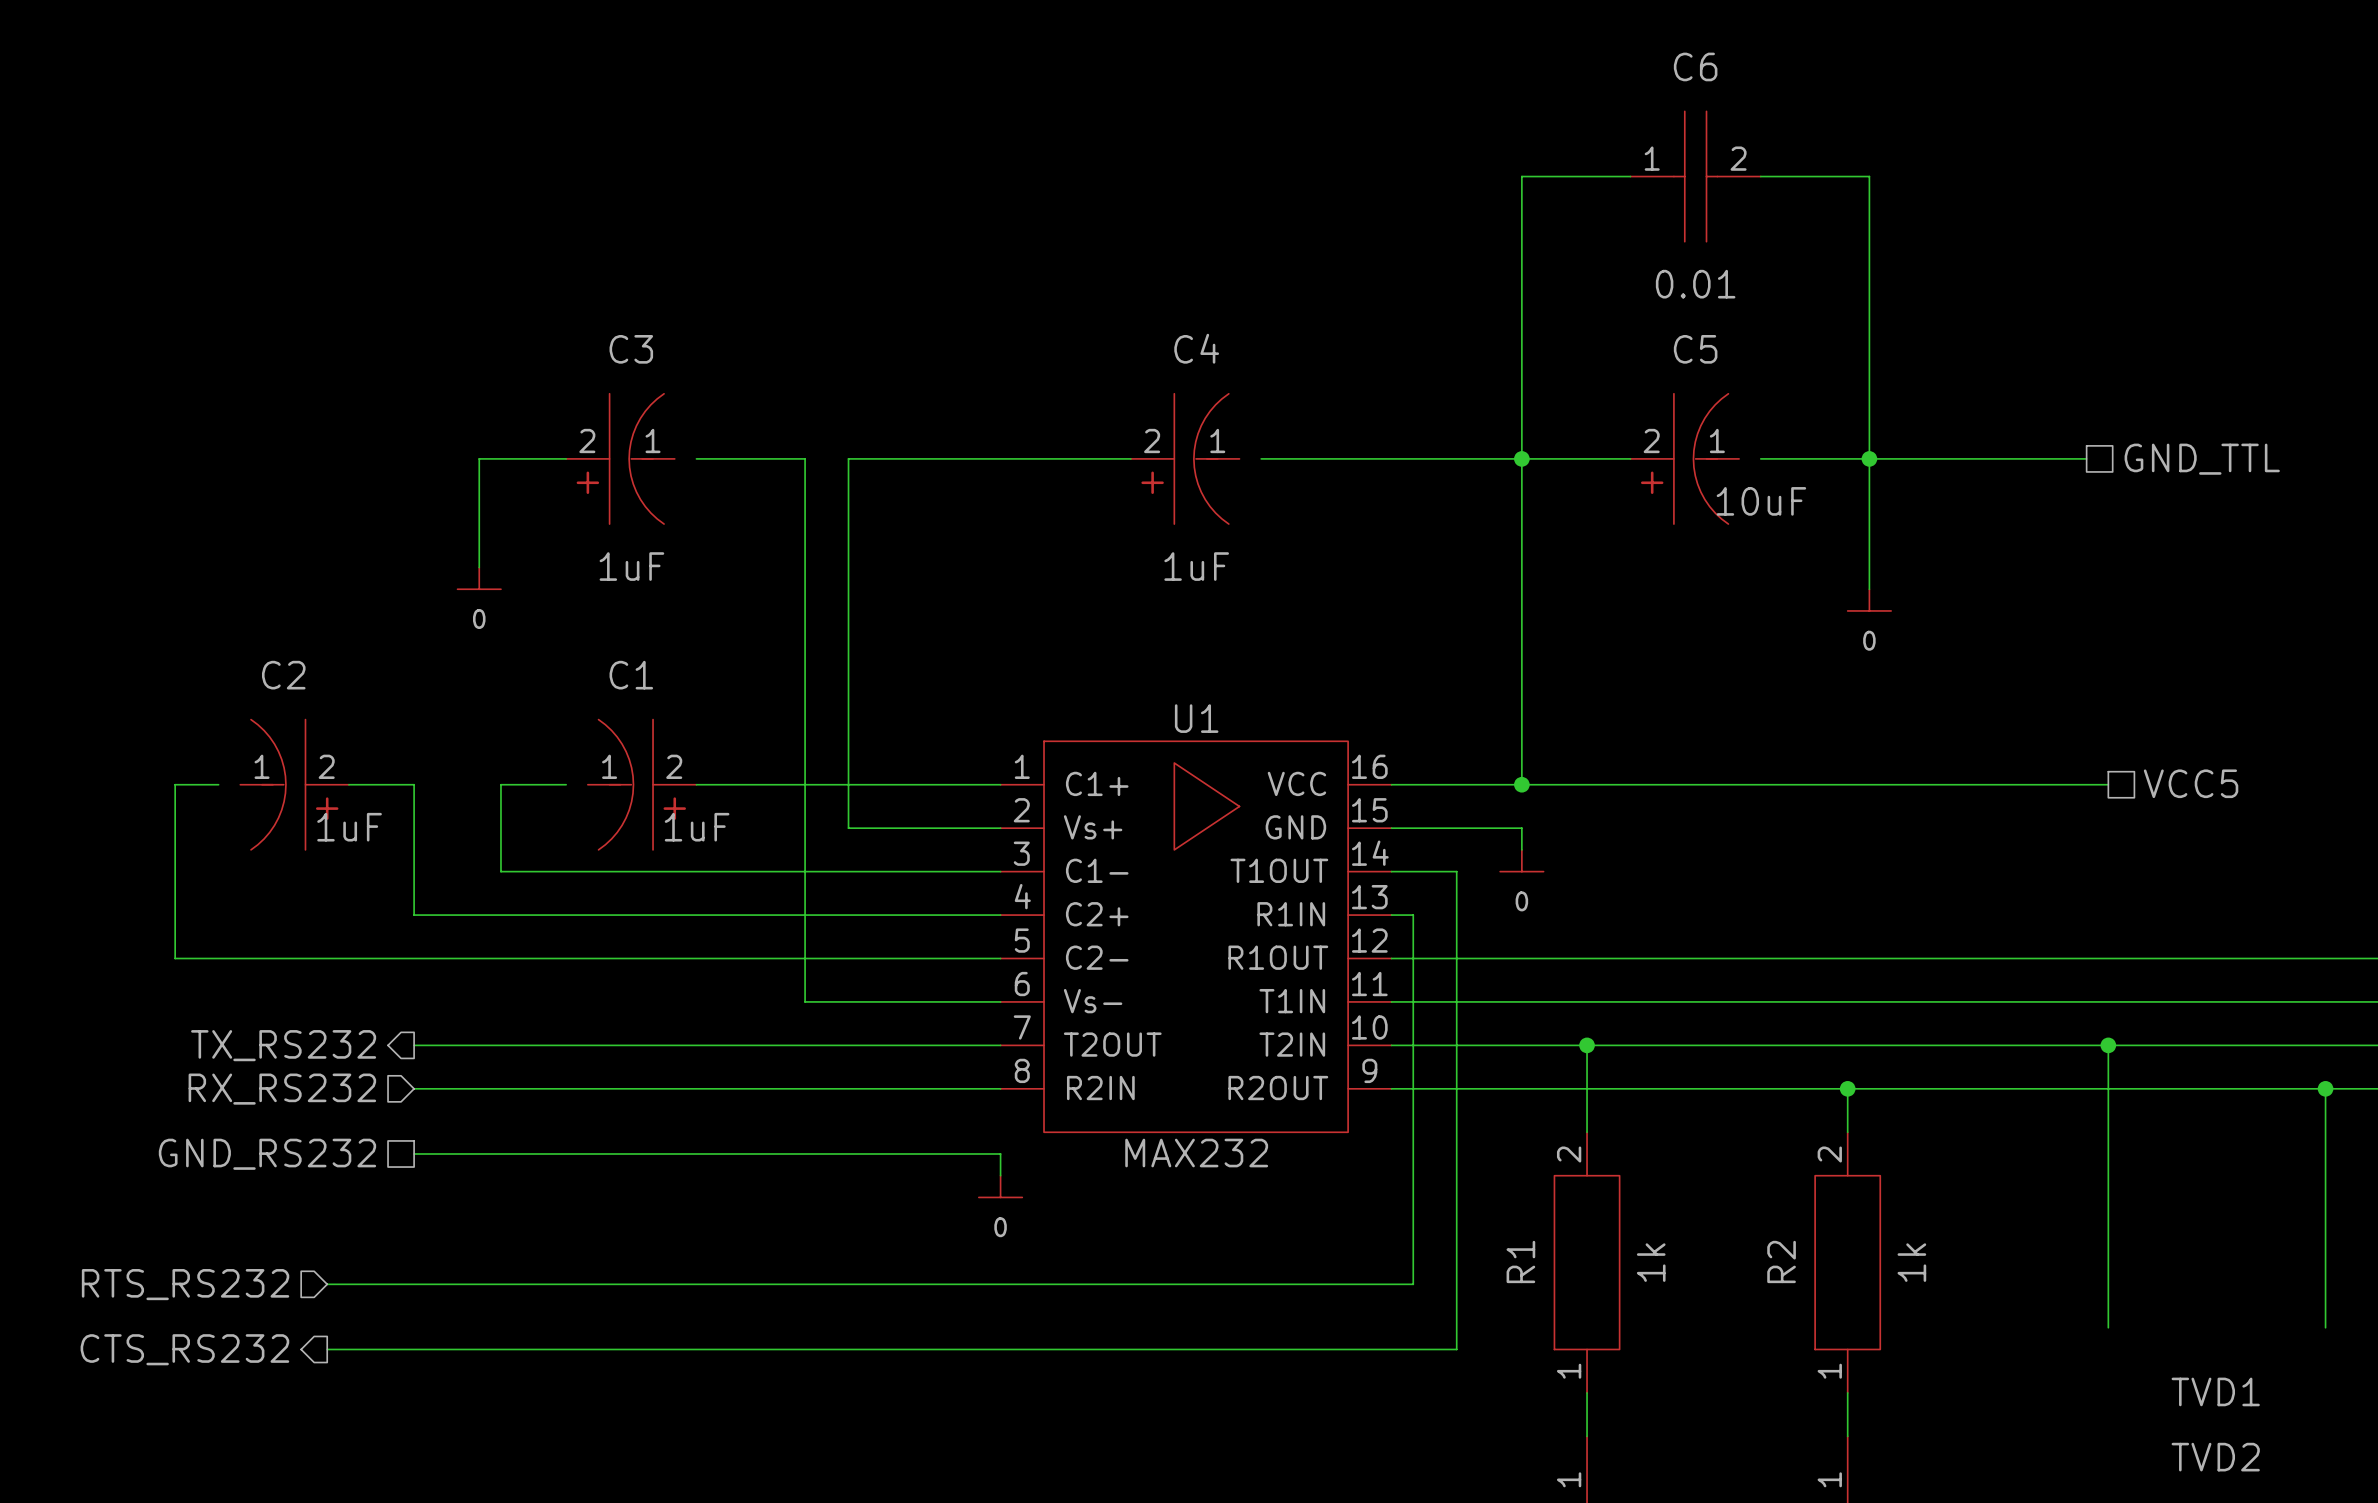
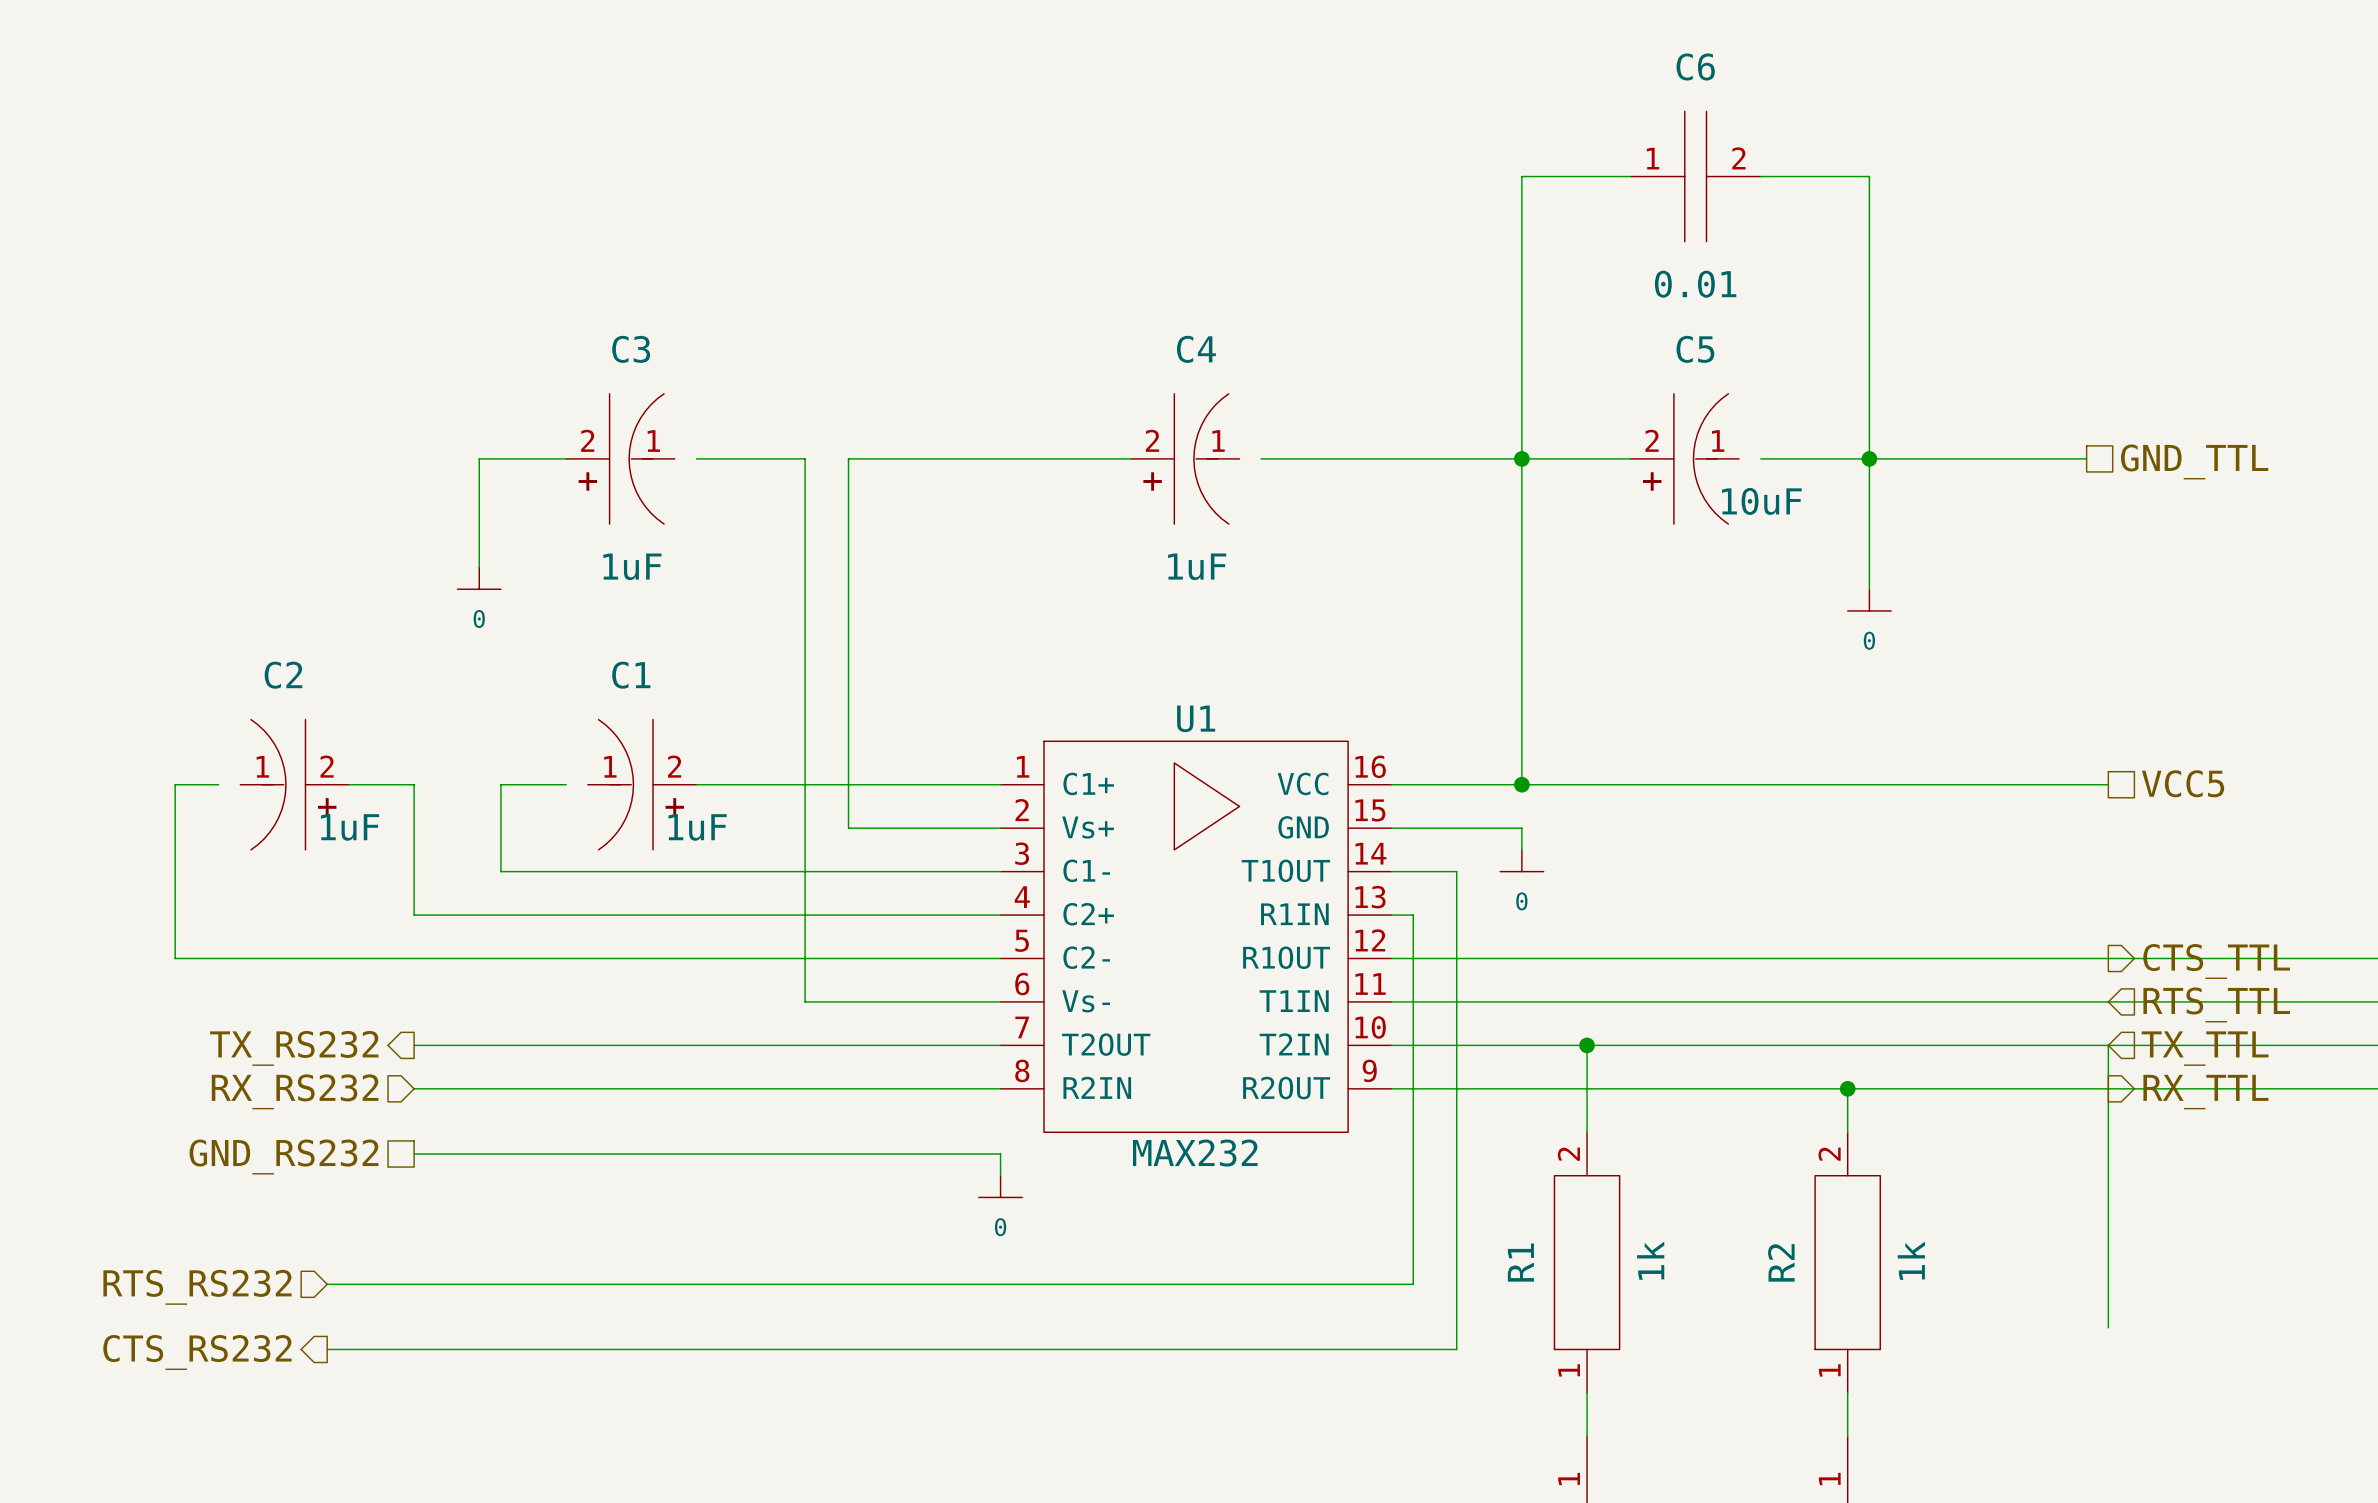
hierarchical label: none -> CTS_TTL (2216, 961)
hierarchical label: none -> RTS_TTL (2216, 1004)
junction: (2108, 1045) -> none
hierarchical label: none -> TX_TTL (2205, 1048)
wire: (2325, 1088) (2325, 1327) -> none
junction: (2325, 1088) -> none
hierarchical label: none -> RX_TTL (2205, 1092)
TVD1: TVD2 (2215, 1424) -> none

